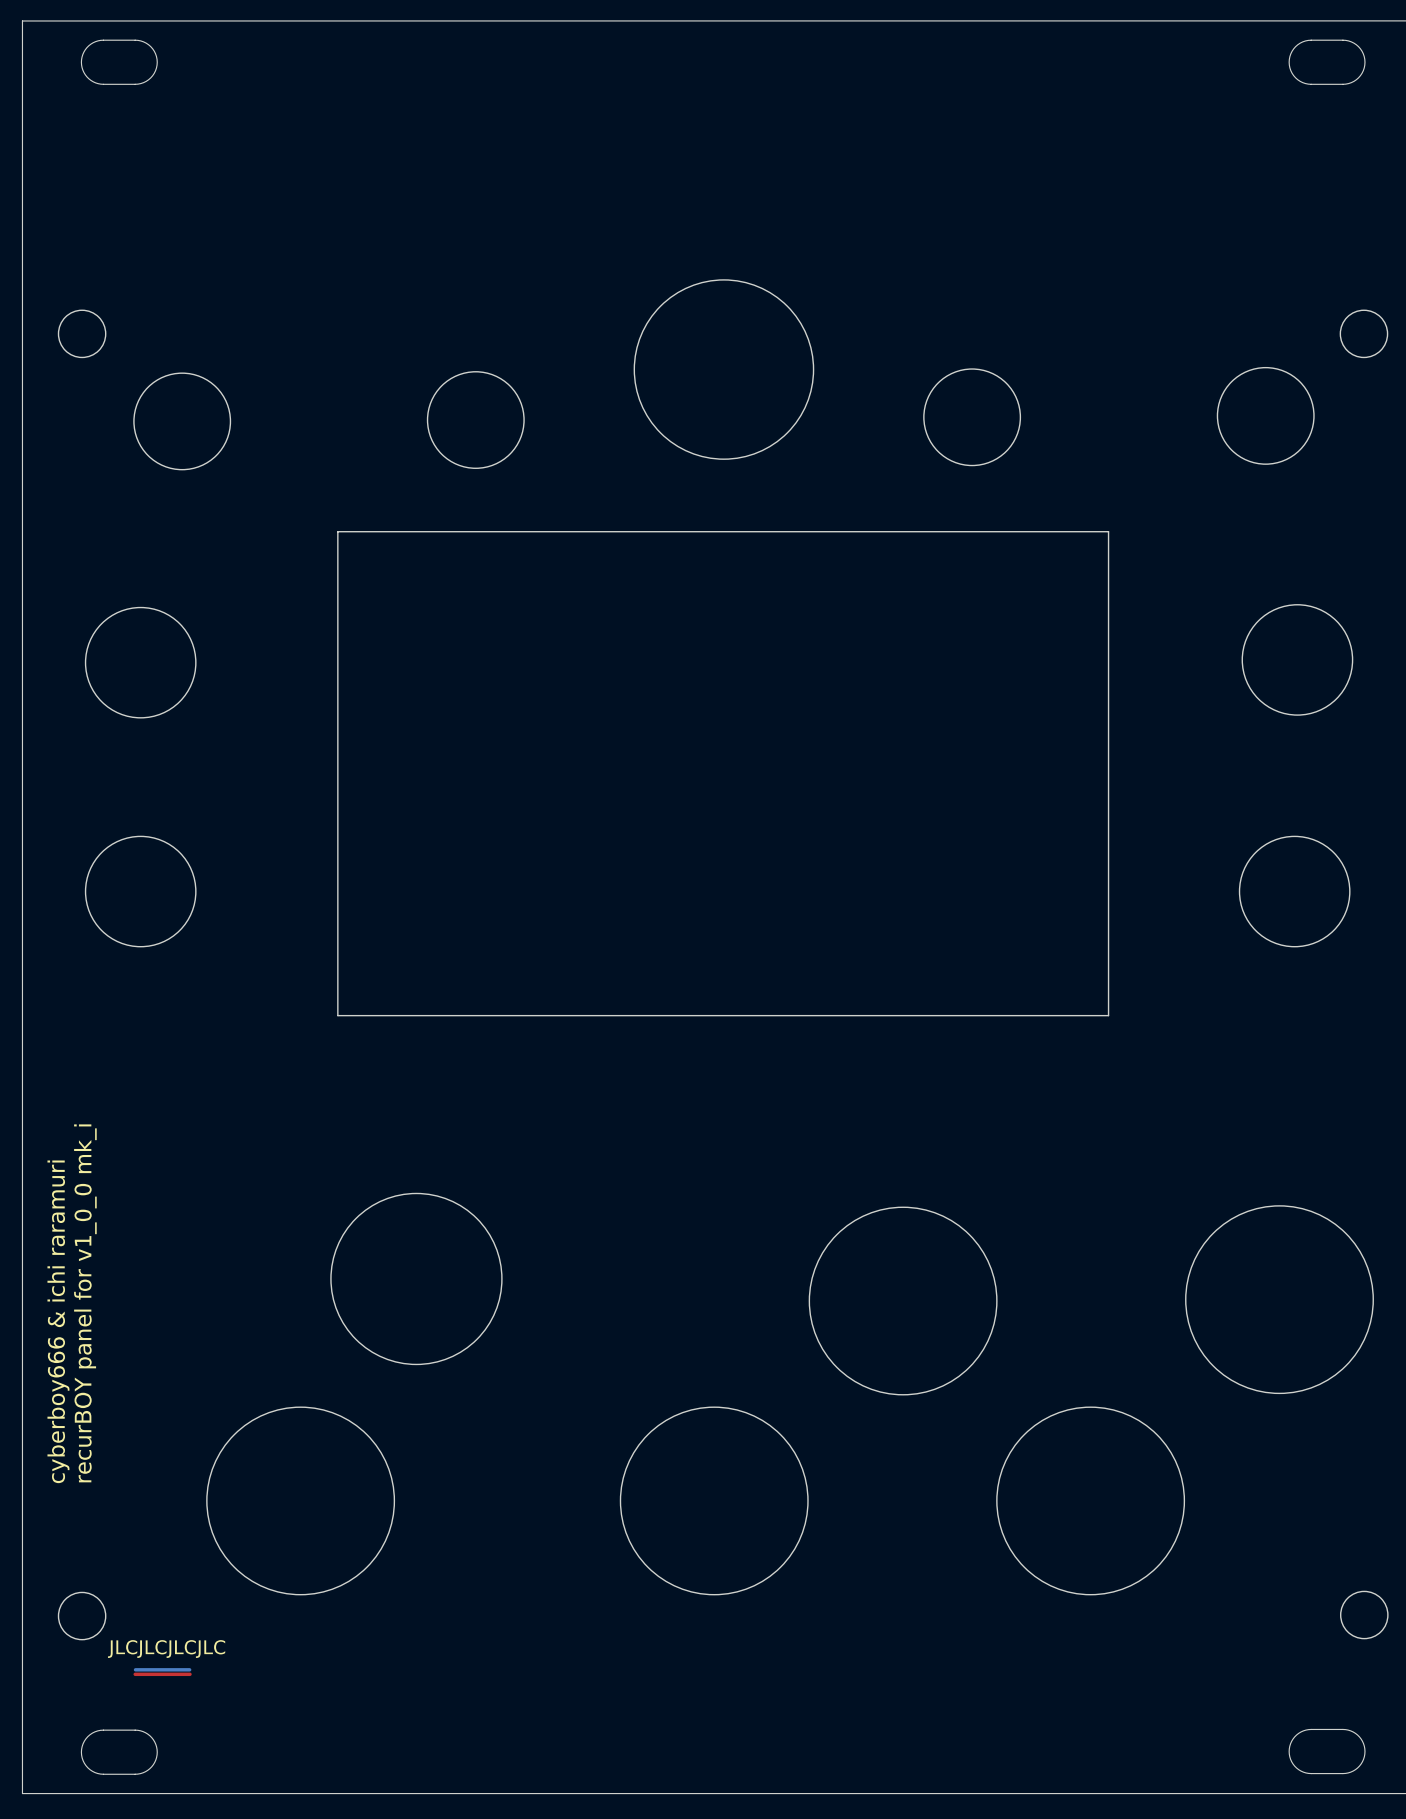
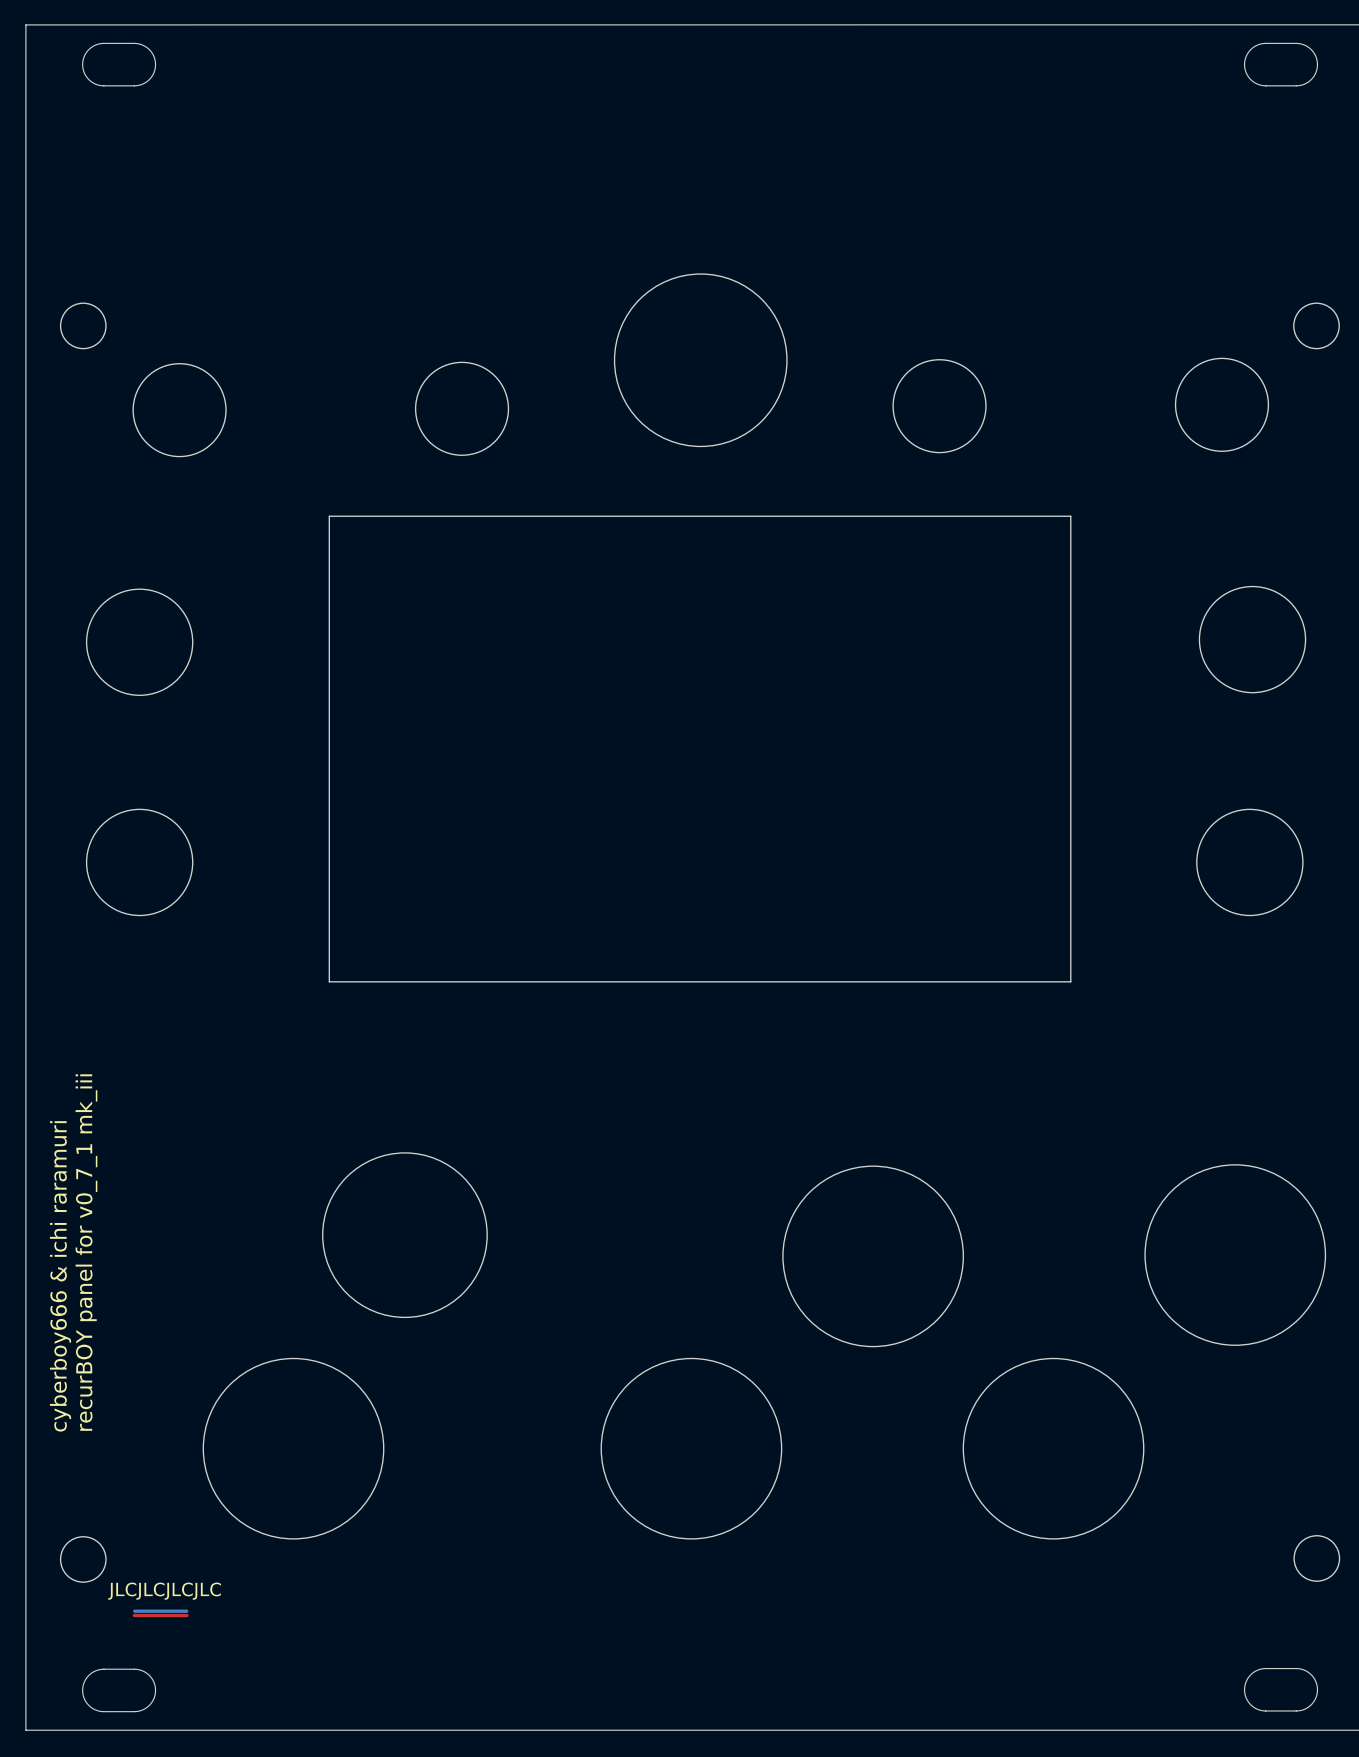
text: recurBOY panel for v1_0_0 mk_i (85, 1303) -> recurBOY panel for v0_7_1 mk_iii (86, 1252)

